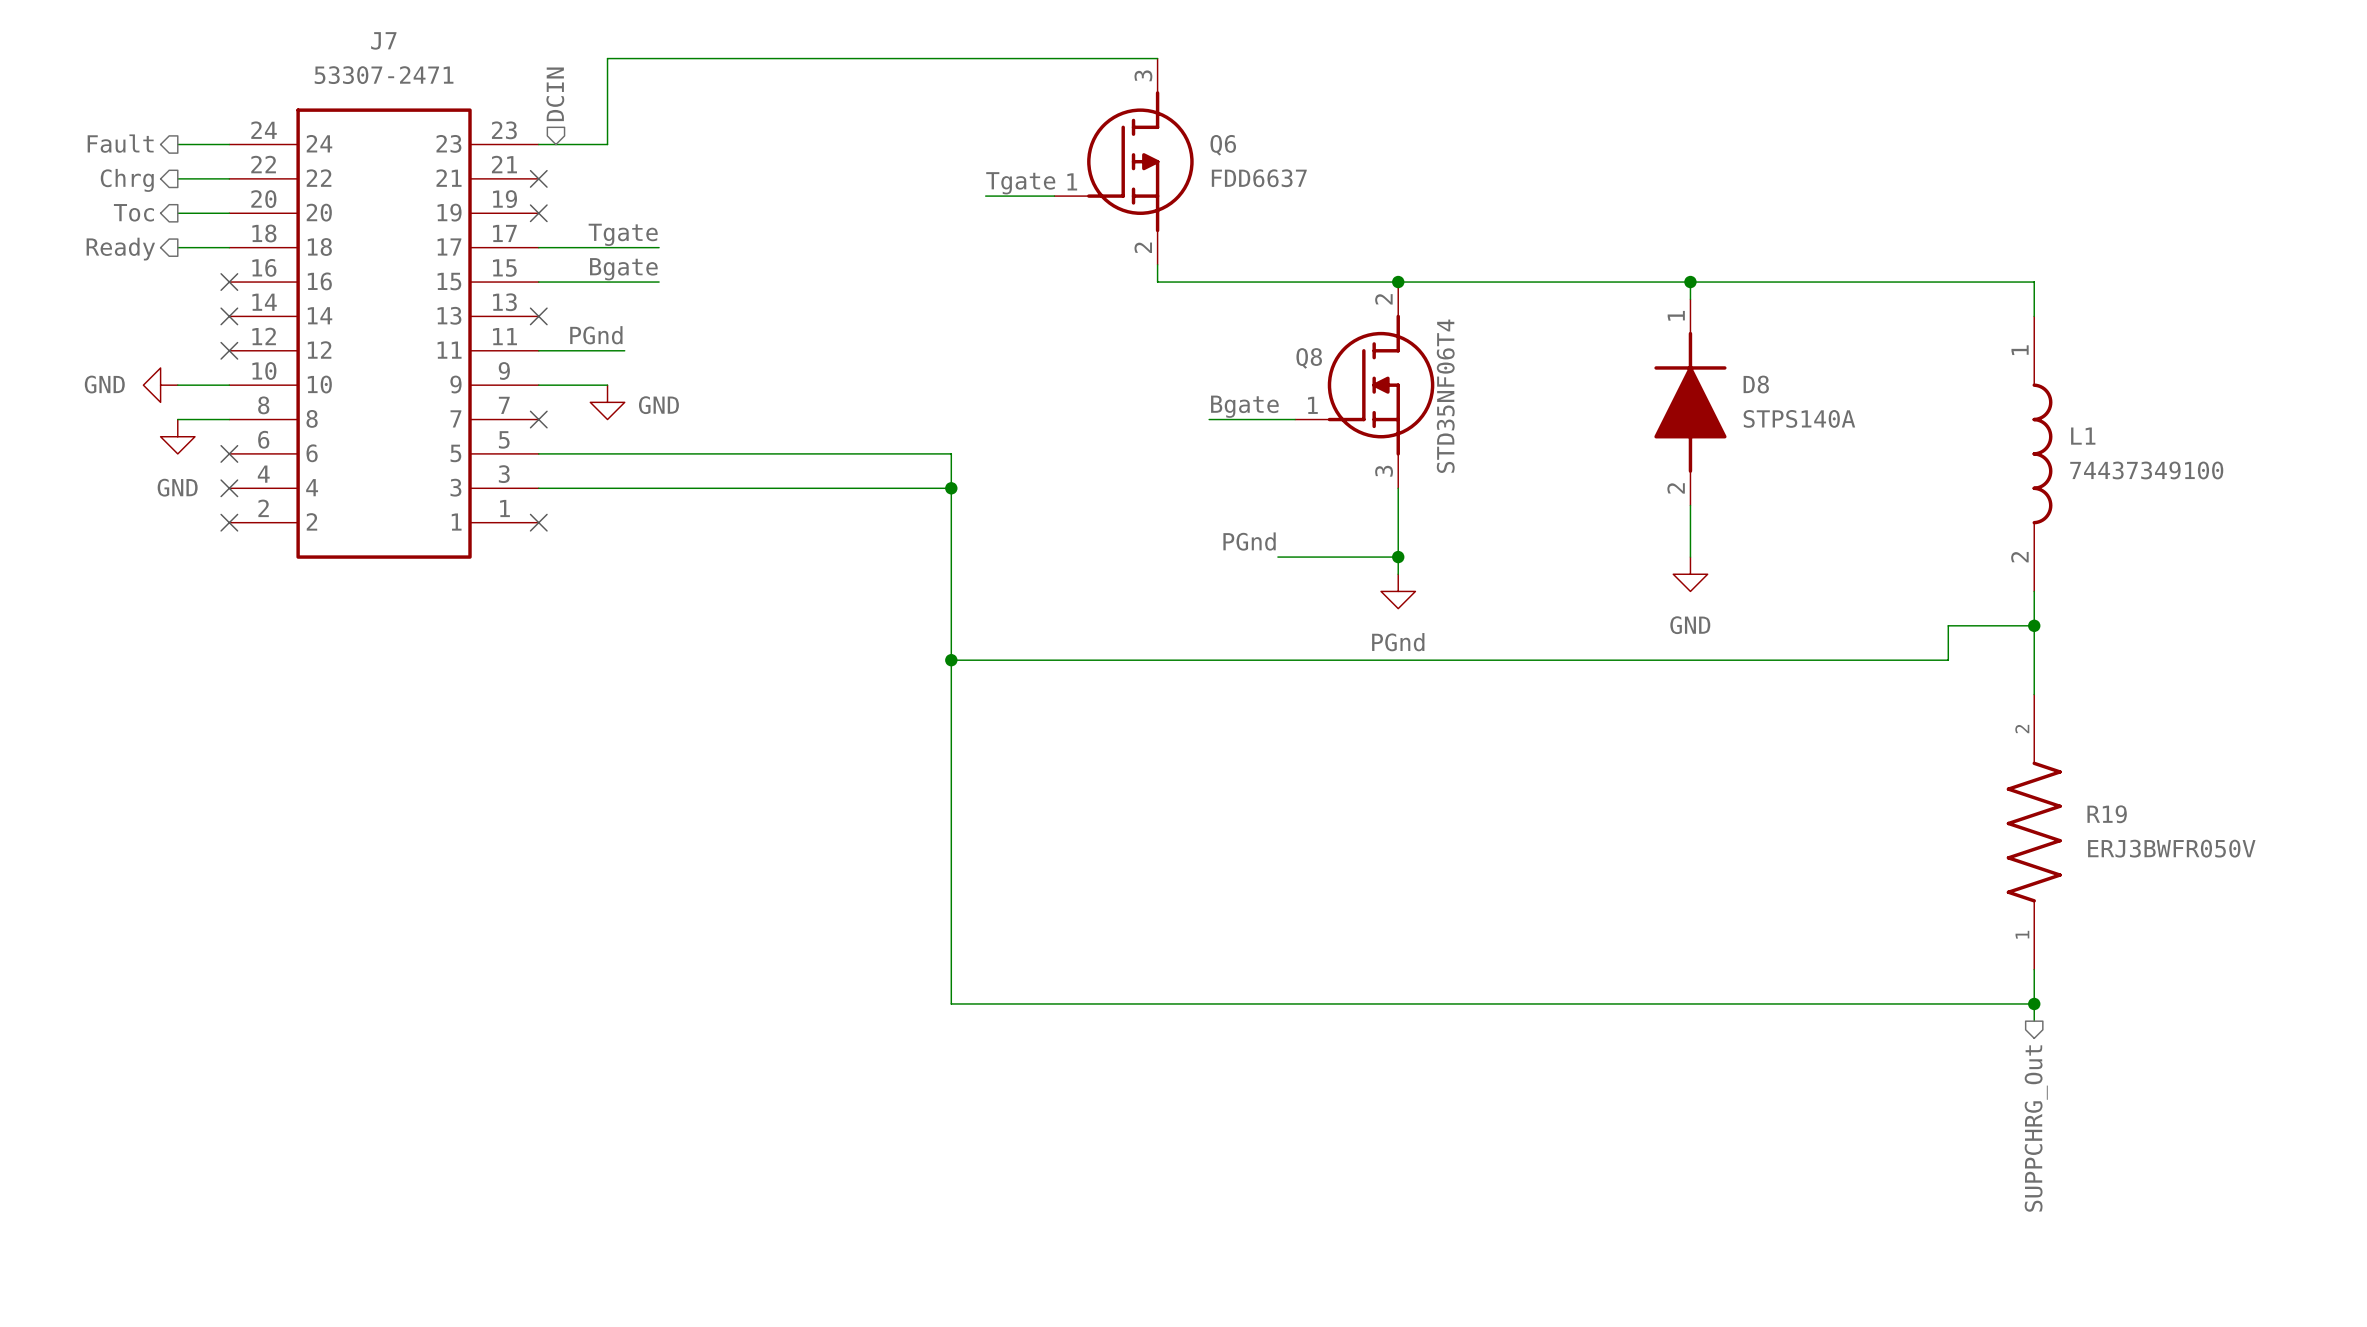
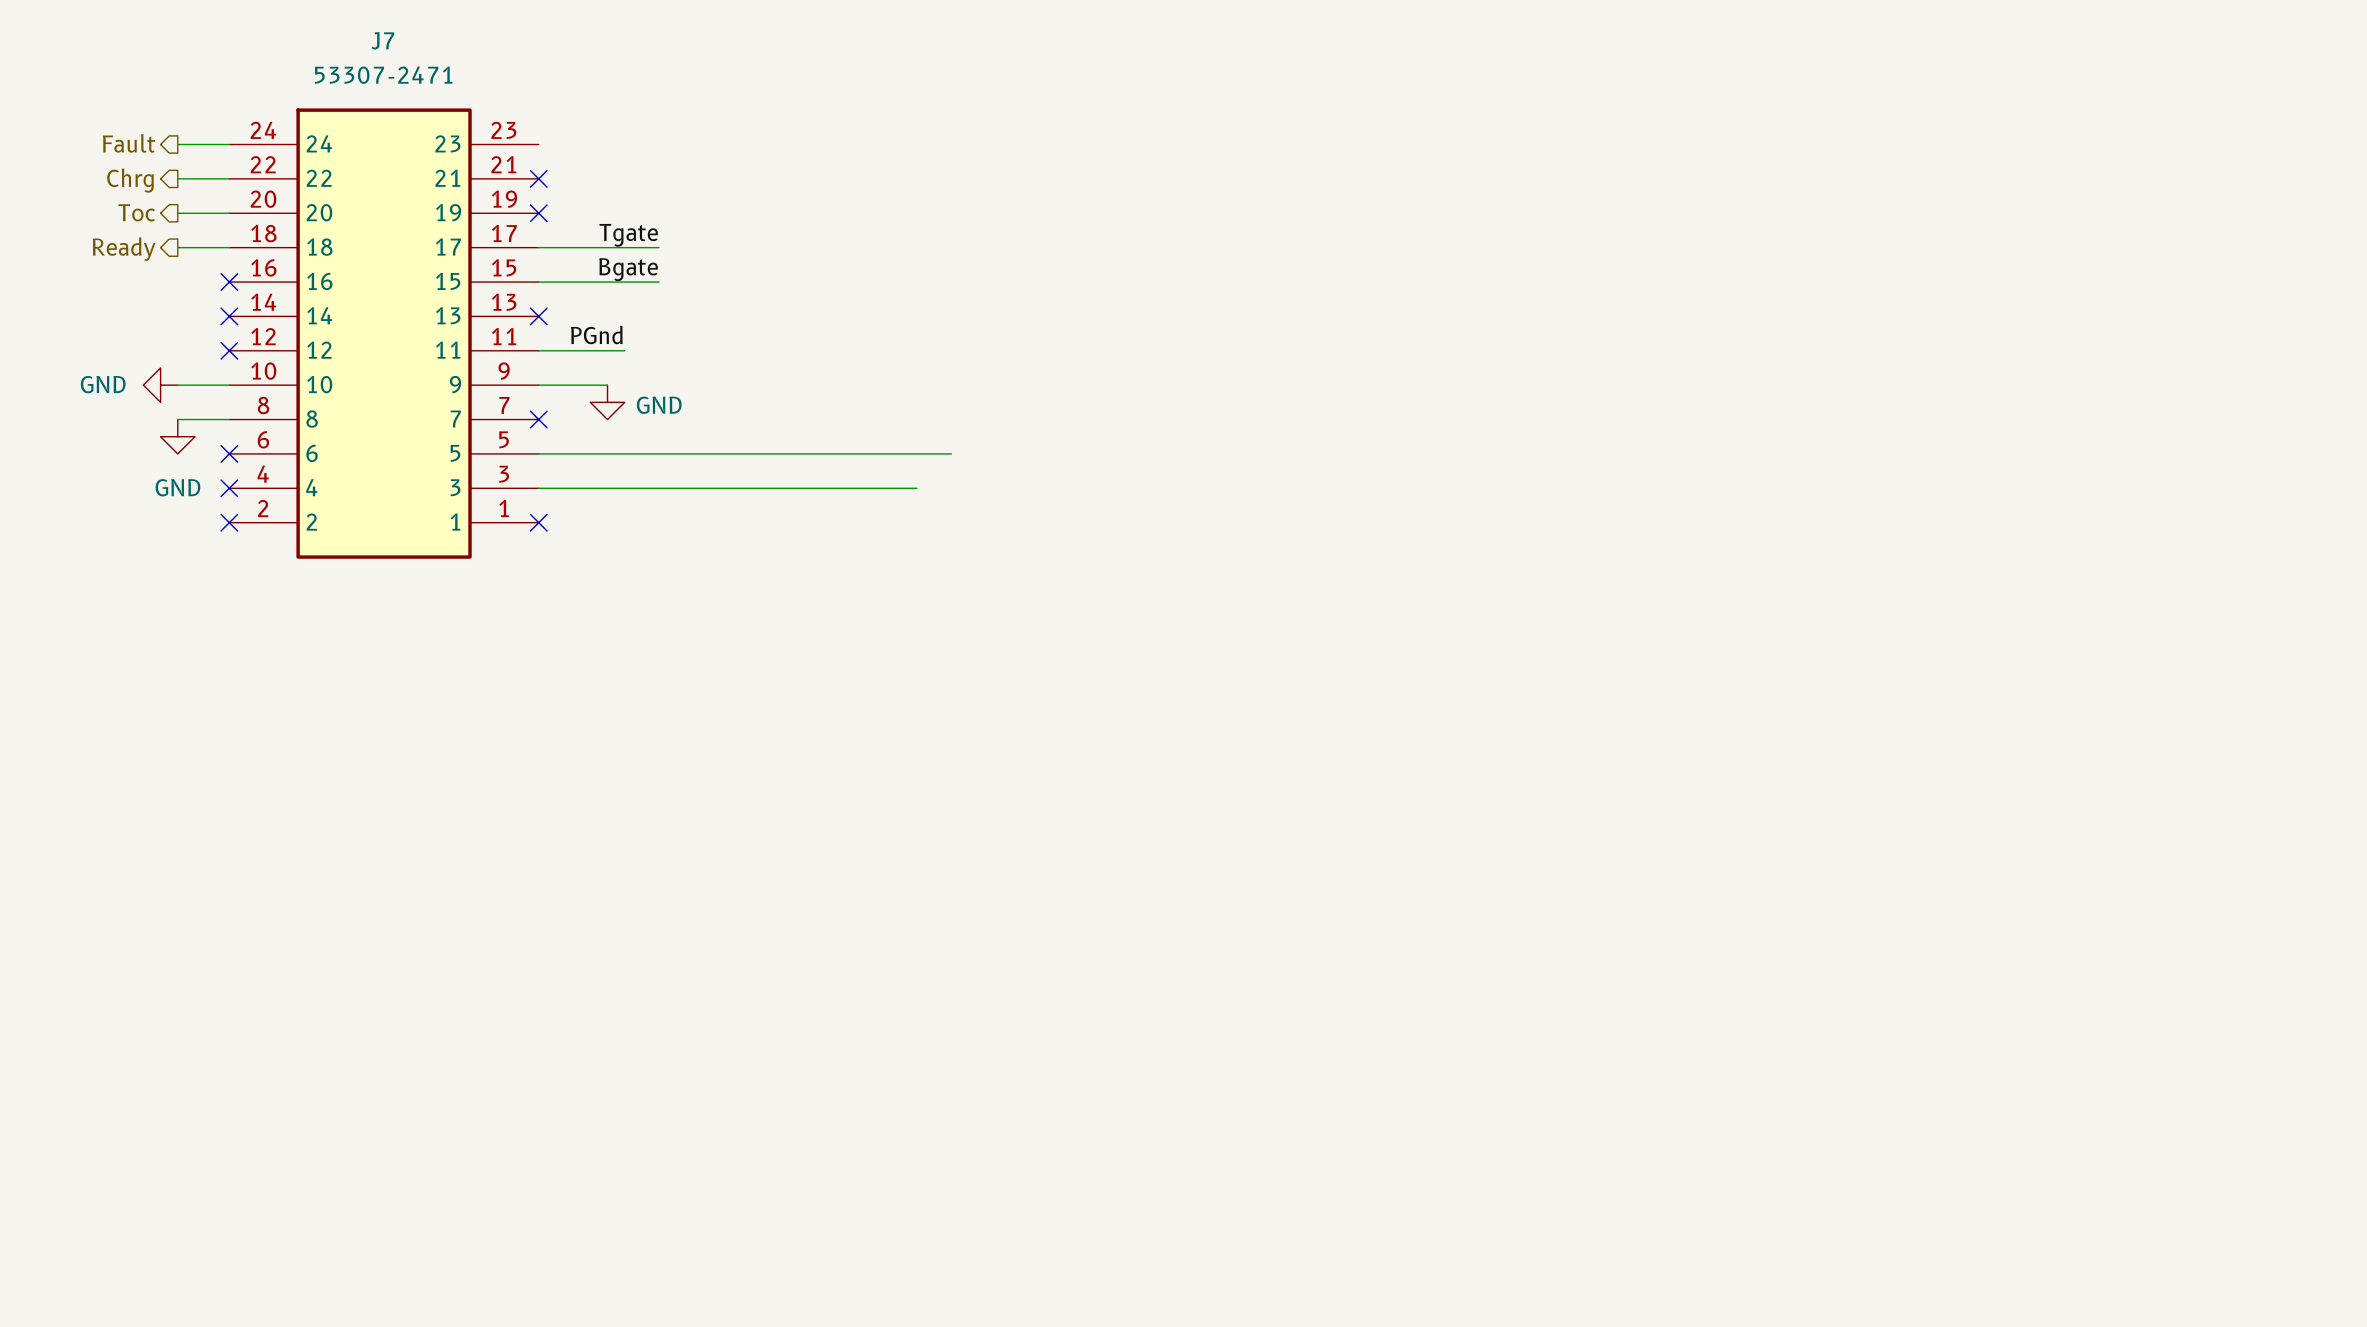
wire: (1157, 58) (607, 58) (607, 144) (538, 144) -> none
hierarchical label: DCIN (555, 94) -> none
Q6: FDD6637 (1124, 161) -> none
label: Tgate (1020, 183) -> none
wire: (985, 196) (1054, 196) -> none
wire: (1157, 264) (1157, 282) (2034, 282) (2034, 316) -> none
junction: (1398, 282) -> none
wire: (1690, 282) (1690, 299) -> none
junction: (1690, 282) -> none
Q8: STD35NF06T4 (1364, 385) -> none
D8: STPS140A (1690, 402) -> none
label: Bgate (1244, 406) -> none
wire: (1209, 419) (1295, 419) -> none
wire: (951, 453) (951, 1003) (2034, 1003) -> none
L1: 74437349100 (2042, 453) -> none
wire: (916, 488) (951, 488) -> none
junction: (951, 488) -> none
wire: (1398, 488) (1398, 574) -> none
wire: (1690, 505) (1690, 557) -> none
label: PGnd (1249, 541) -> none
wire: (1277, 557) (1398, 557) -> none
junction: (1398, 557) -> none
power symbol: GND (1690, 574) -> none
power symbol: PGnd (1398, 591) -> none
wire: (2034, 591) (2034, 694) -> none
wire: (2034, 625) (1948, 625) (1948, 660) (951, 660) -> none
junction: (2034, 625) -> none
junction: (951, 660) -> none
R19: ERJ3BWFR050V (2034, 832) -> none
wire: (2034, 969) (2034, 1021) -> none
junction: (2034, 1003) -> none
hierarchical label: SUPPCHRG_Out (2036, 1128) -> none

